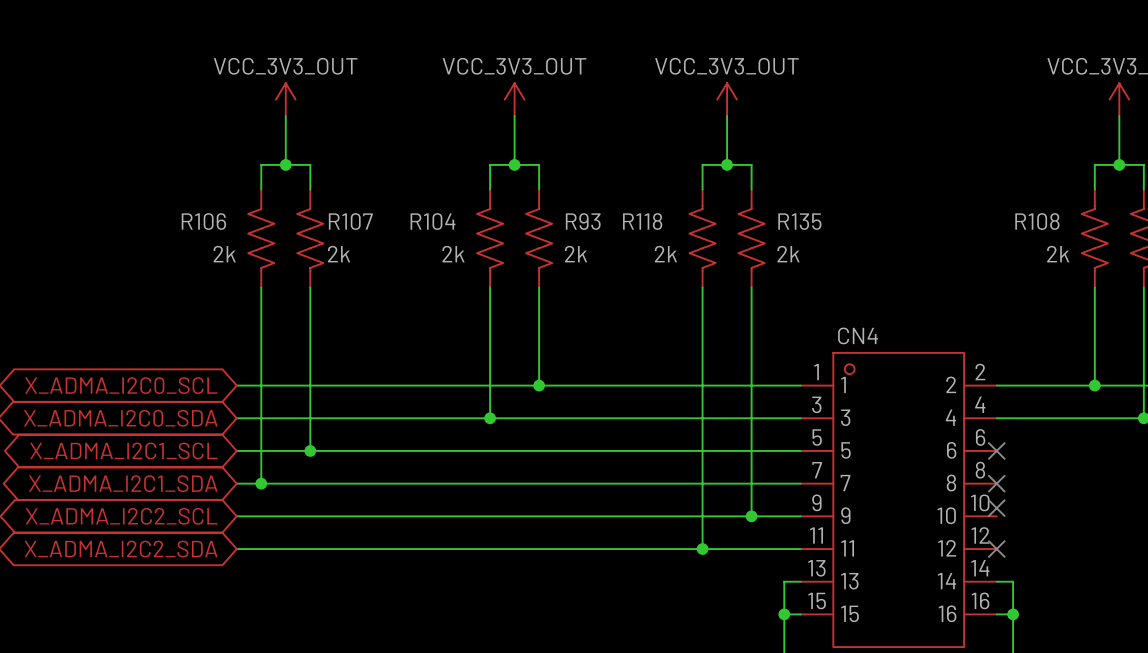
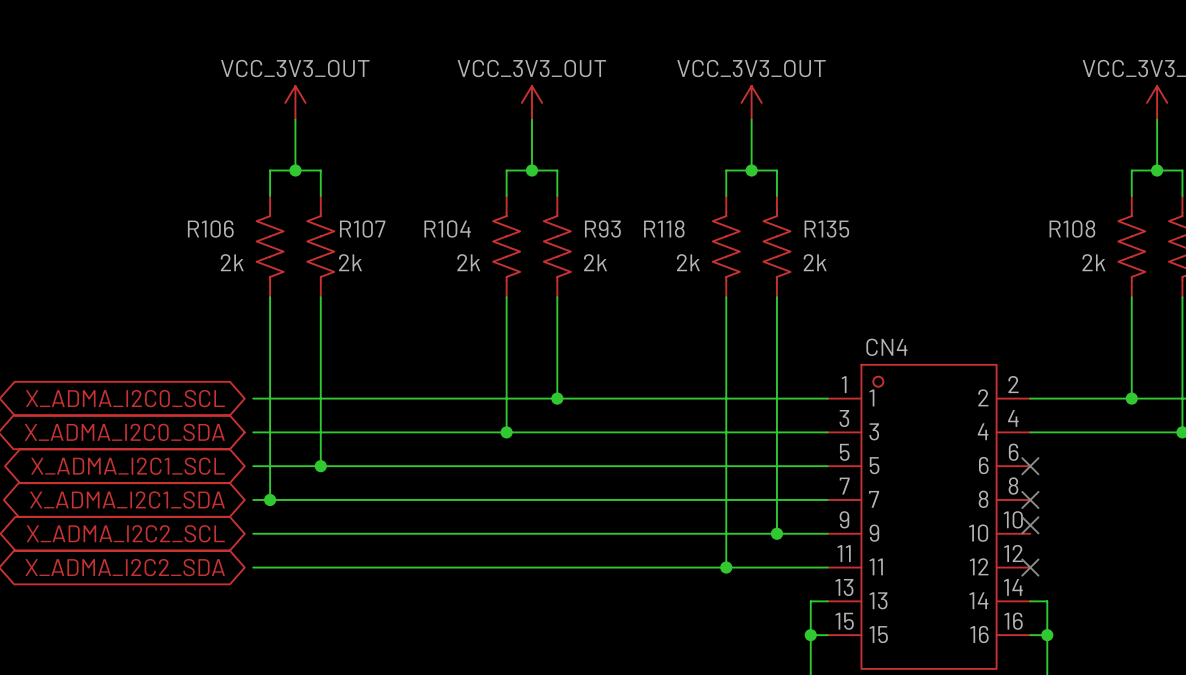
wire: (236, 385) (244, 385) -> none
wire: (236, 418) (244, 418) -> none
wire: (236, 450) (244, 450) -> none
wire: (236, 483) (244, 483) -> none
wire: (236, 516) (244, 516) -> none
wire: (236, 549) (244, 549) -> none

